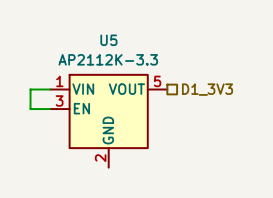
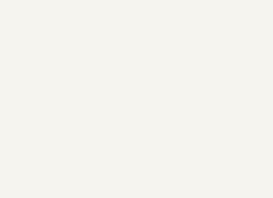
wire: (50, 89) (30, 89) (30, 109) (50, 109) -> none
hierarchical label: D1_3V3 (207, 89) -> none
U5: AP2112K-3.3 (108, 120) -> none

